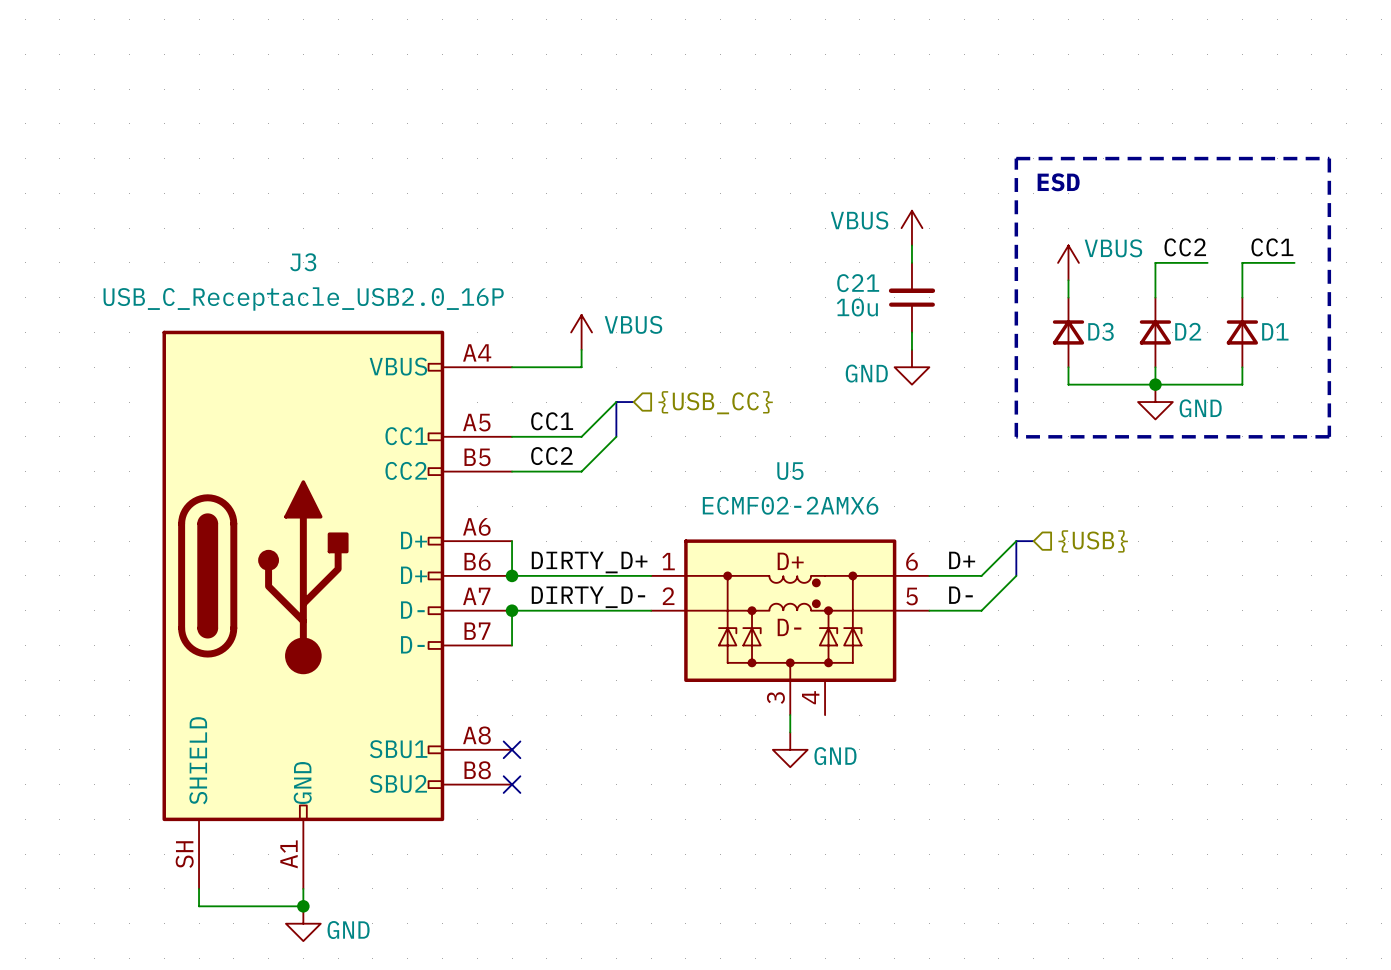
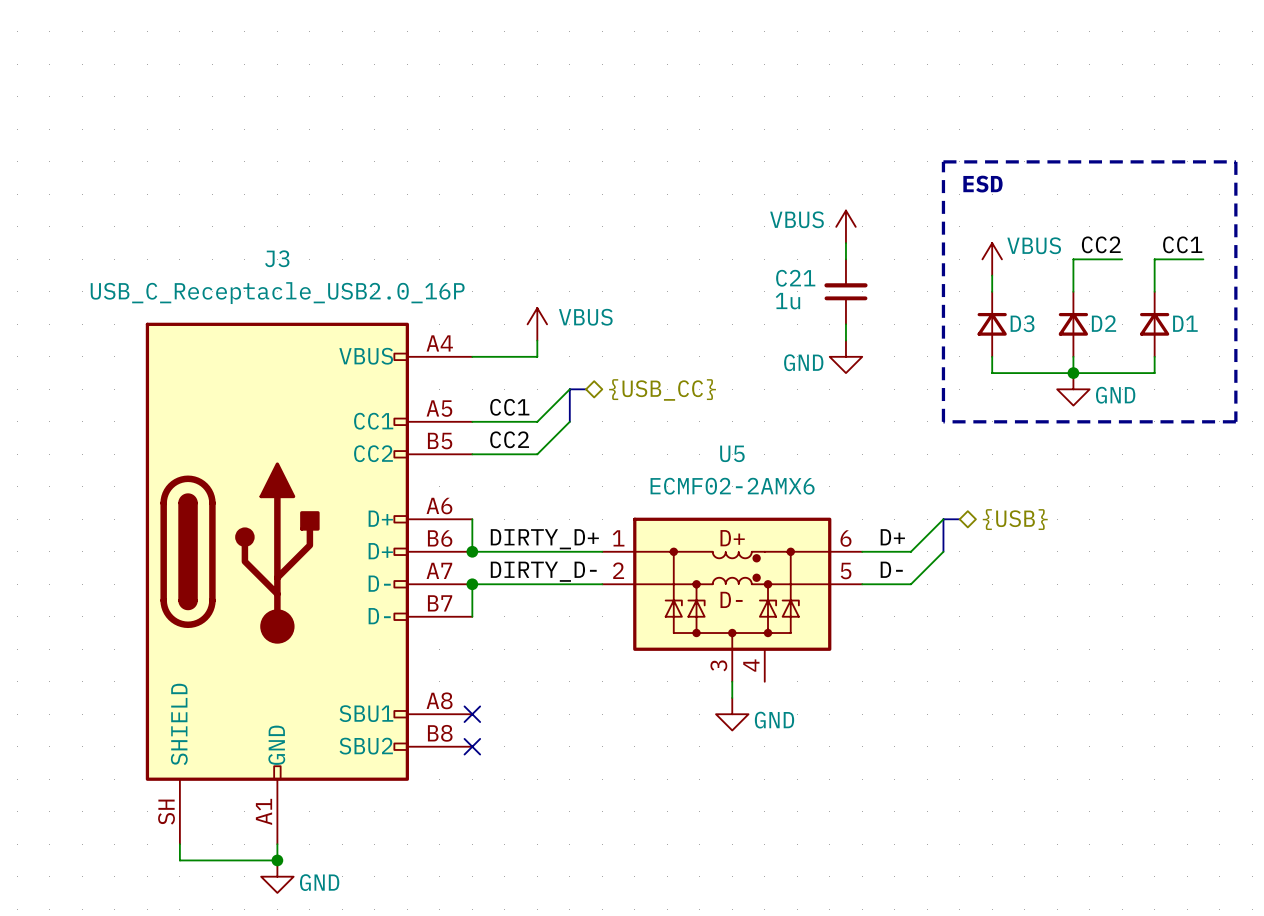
C21 value: 10u (857, 307) -> 1u (787, 301)
hierarchical label shape: input (715, 402) -> bidirectional (662, 389)
hierarchical label shape: input (1093, 541) -> bidirectional (1015, 519)

